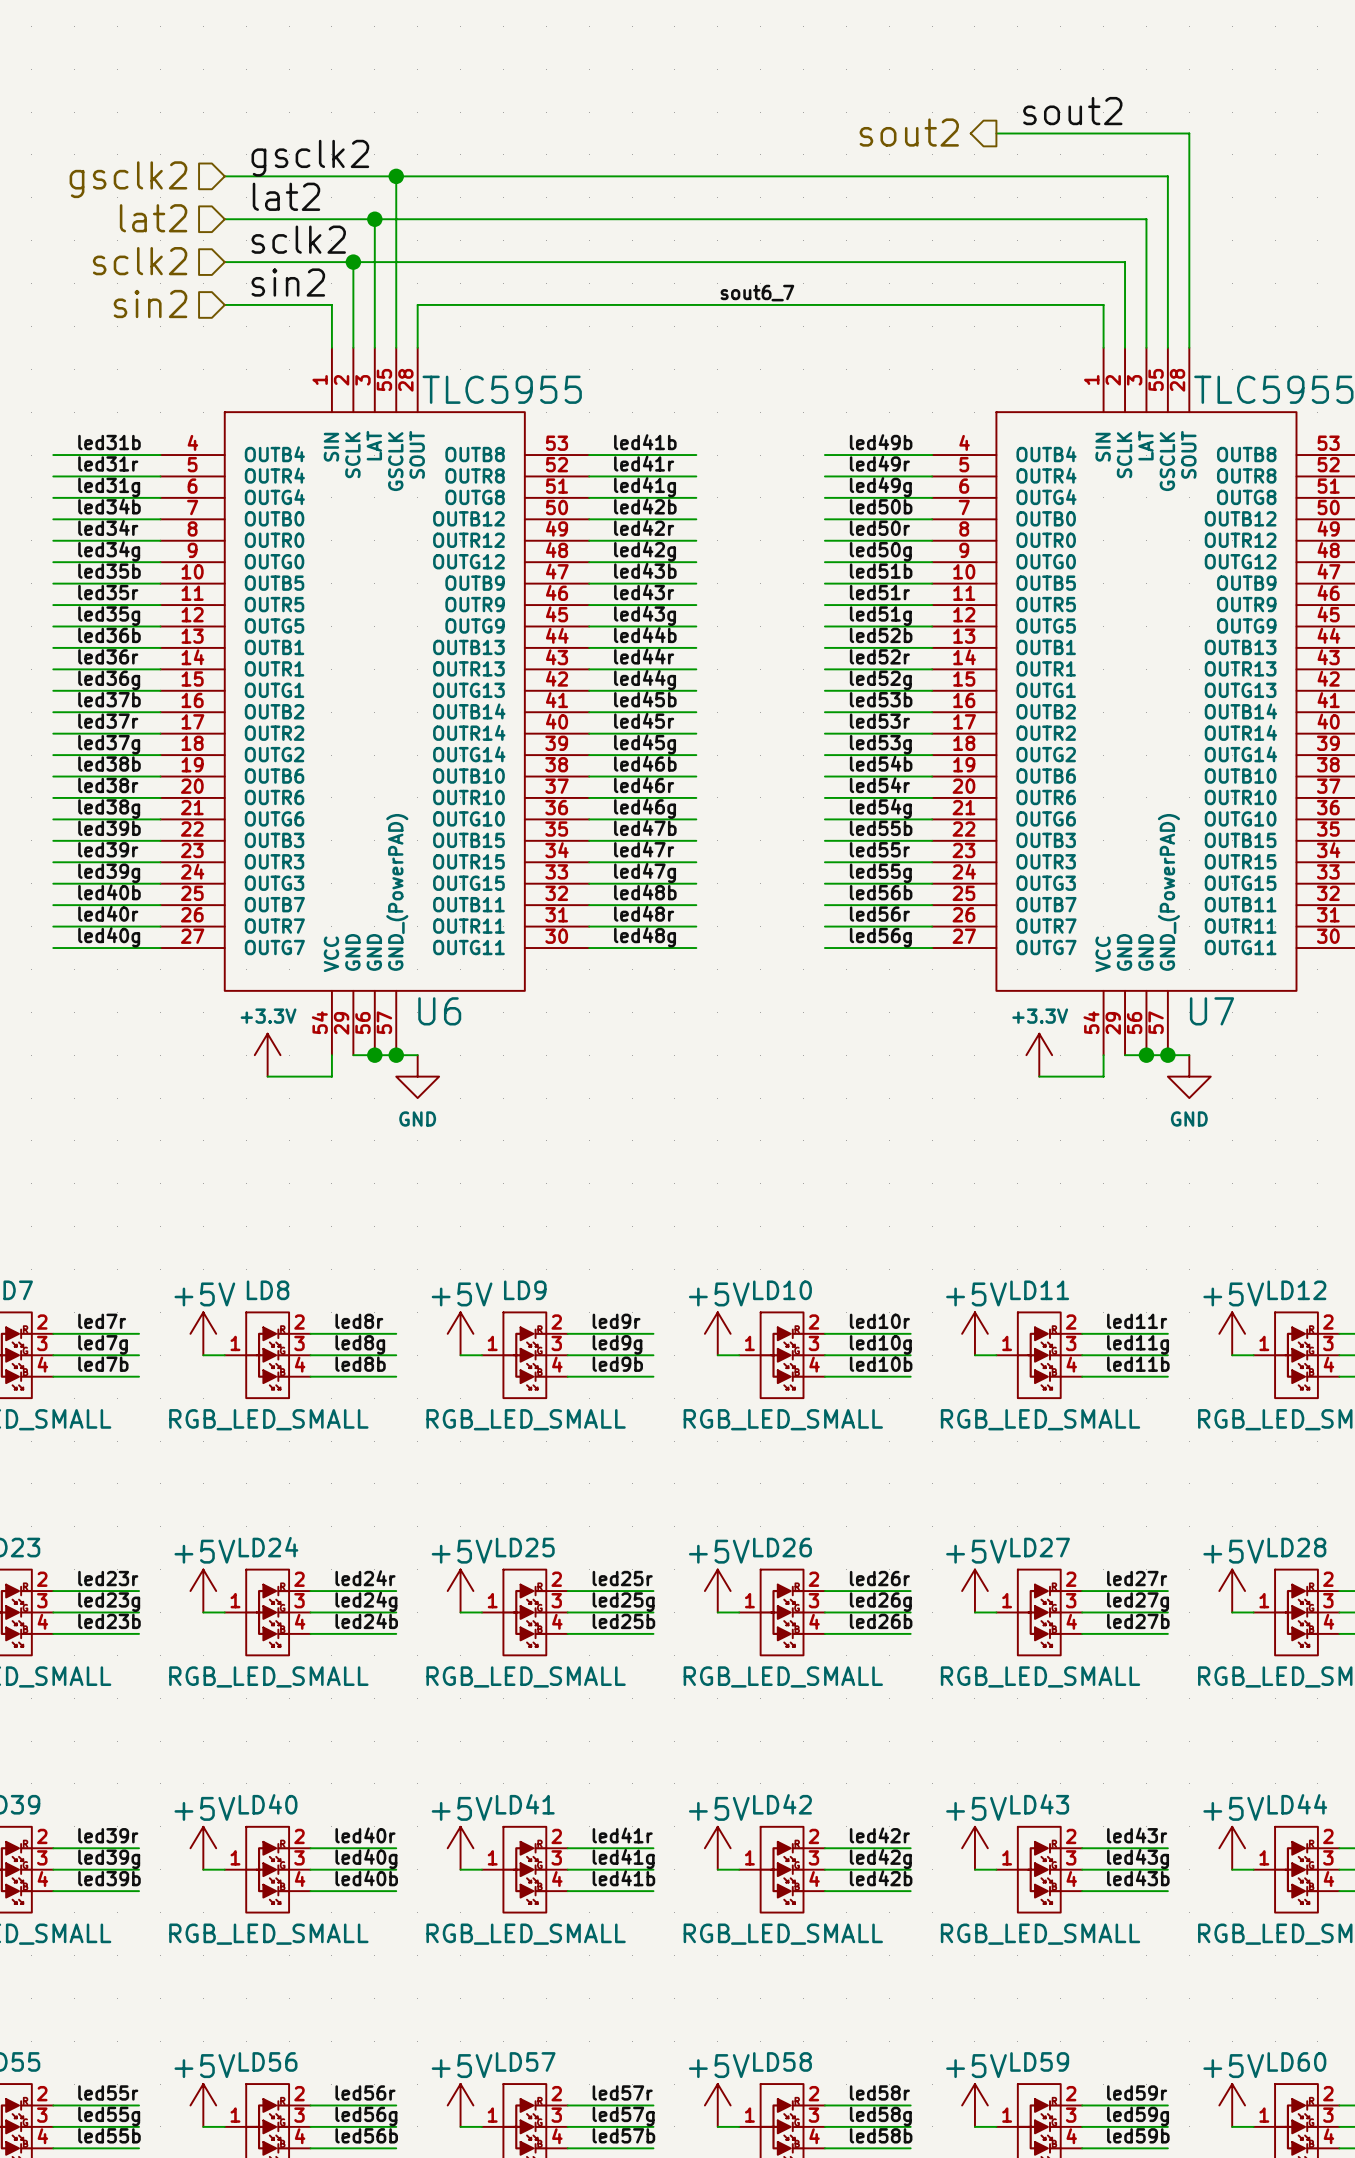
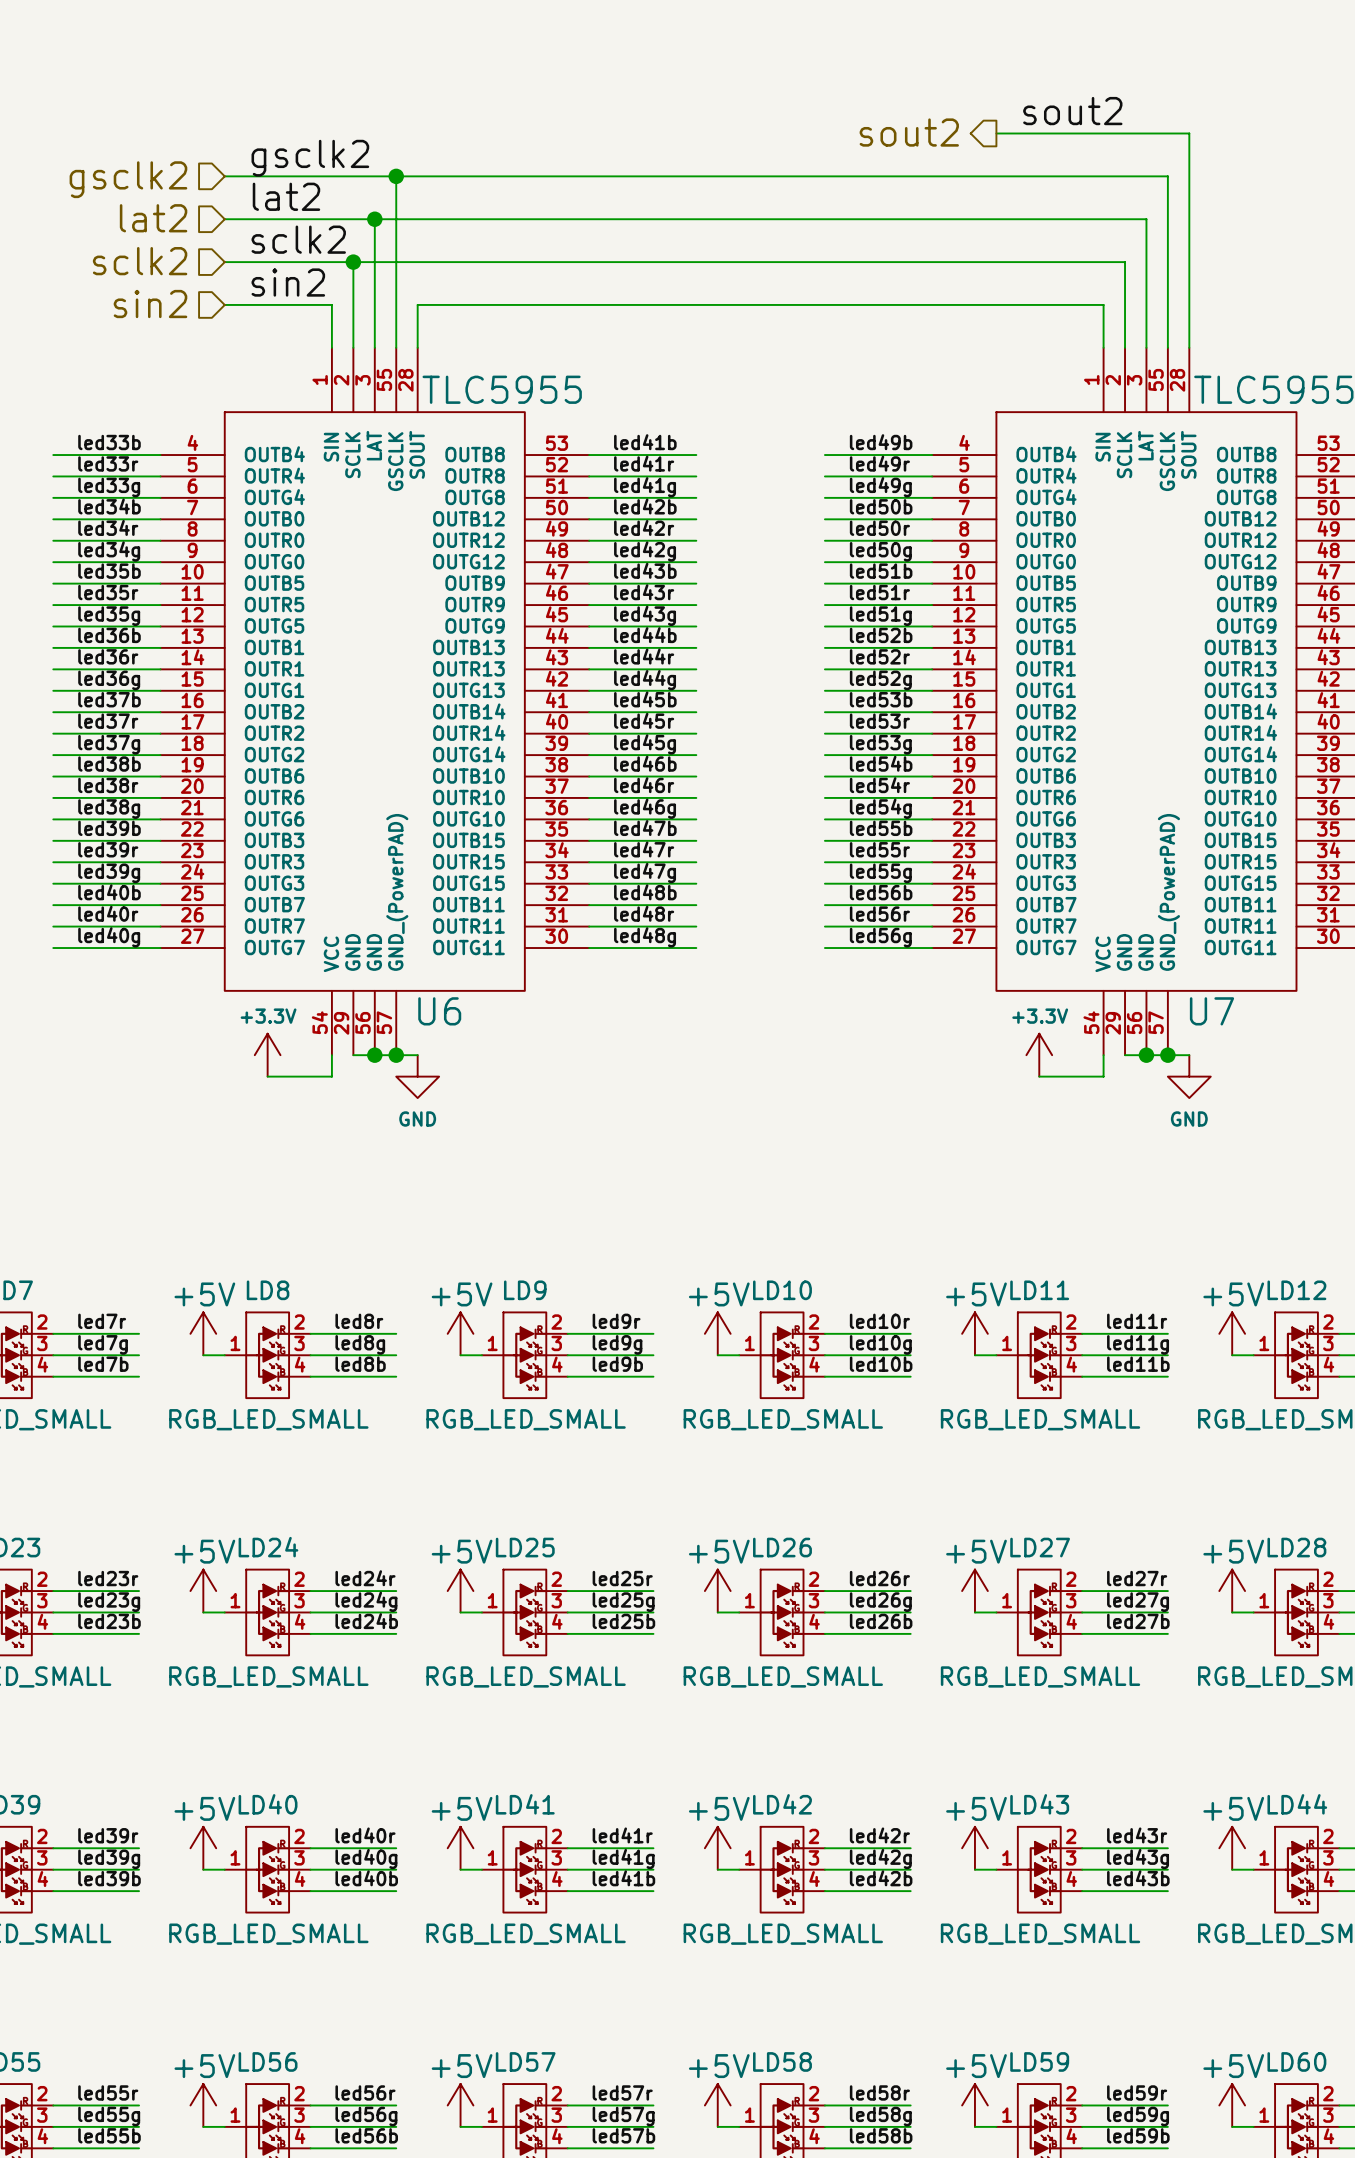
label: sout6_7 (757, 293) -> none
label: led31b (109, 442) -> led33b (109, 442)
label: led31r (108, 463) -> led33r (108, 463)
label: led31g (109, 487) -> led33g (109, 487)

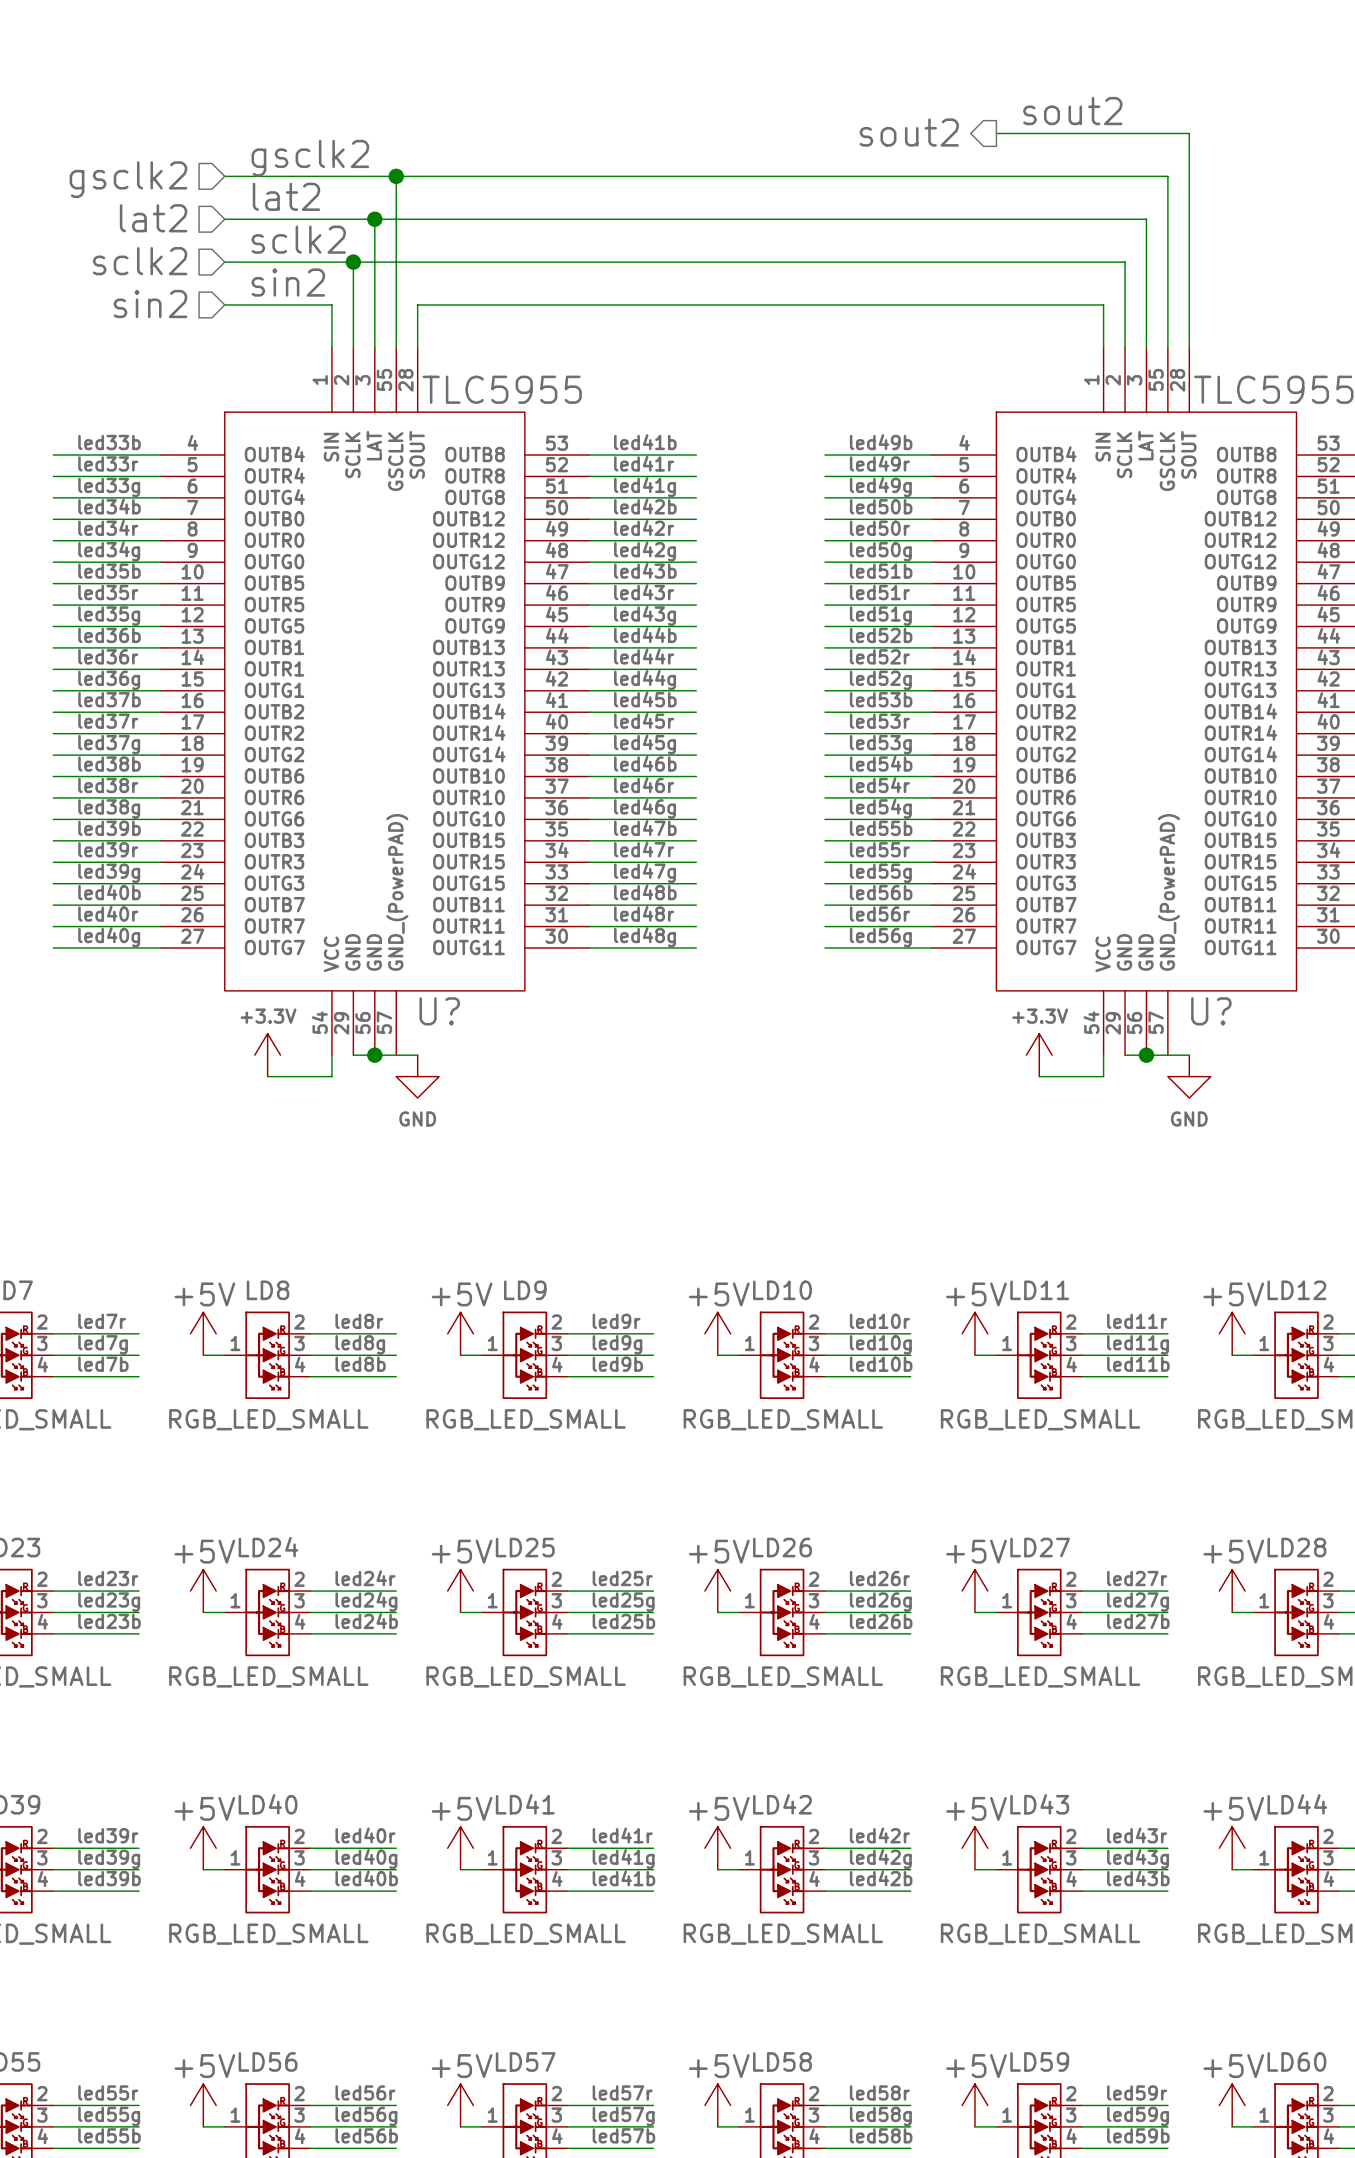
U6 name: U6 (439, 1011) -> U? (439, 1011)
U7 name: U7 (1211, 1011) -> U? (1211, 1011)
junction: (396, 1055) -> none
junction: (1167, 1055) -> none

